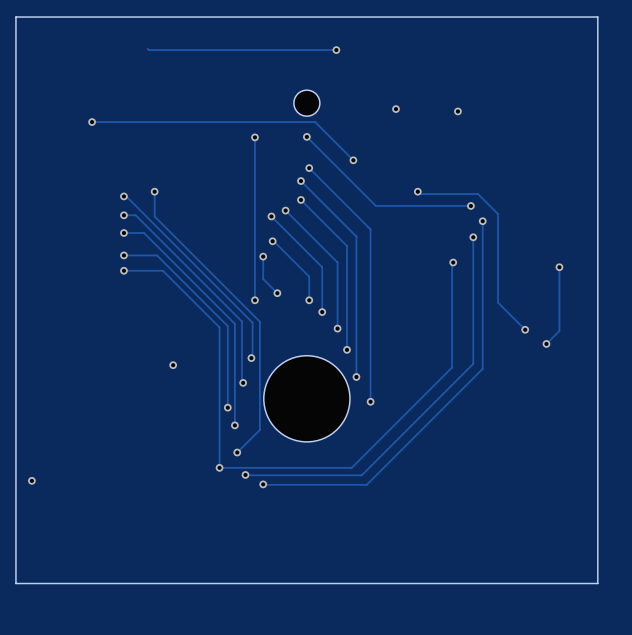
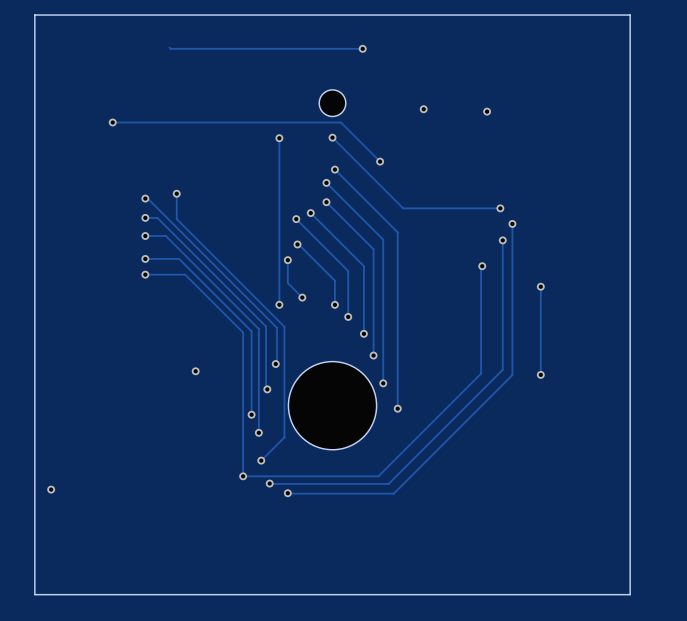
track: (417, 191) (420, 194) (478, 194) (498, 214) (498, 302) (525, 329) -> none
via: (417, 191) -> none
track: (559, 267) (559, 330) (546, 343) -> none
via: (559, 267) -> none
track: none -> (540, 286) (540, 374)
via: none -> (540, 286)
via: (525, 329) -> none
via: (546, 343) -> none
via: none -> (540, 374)

